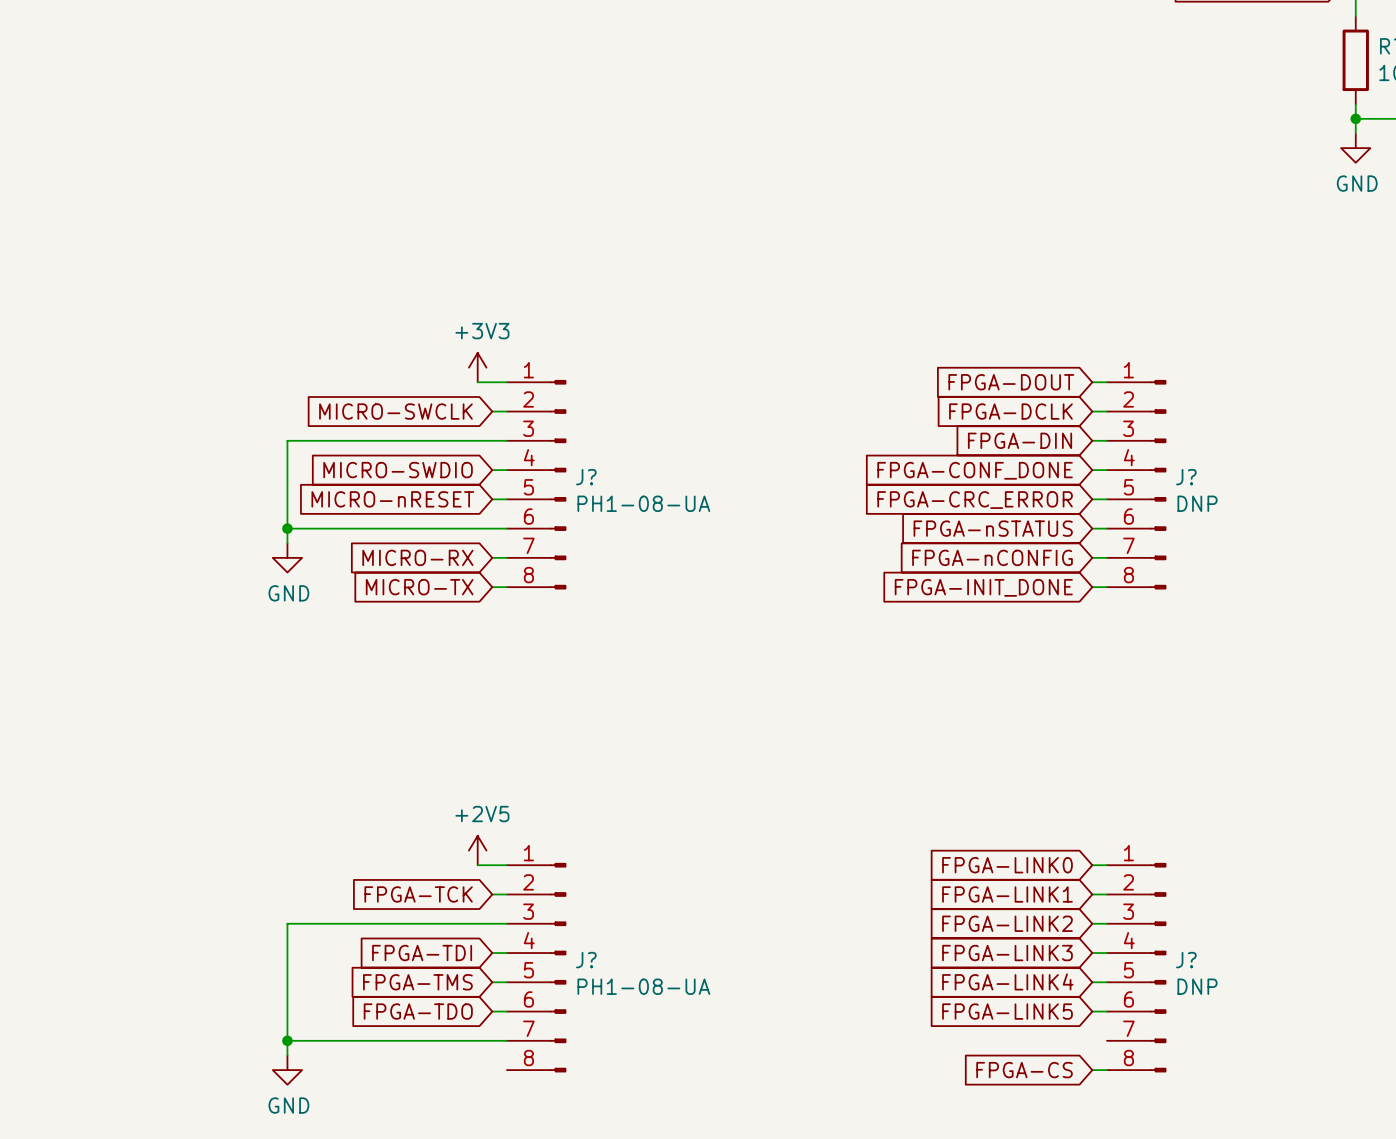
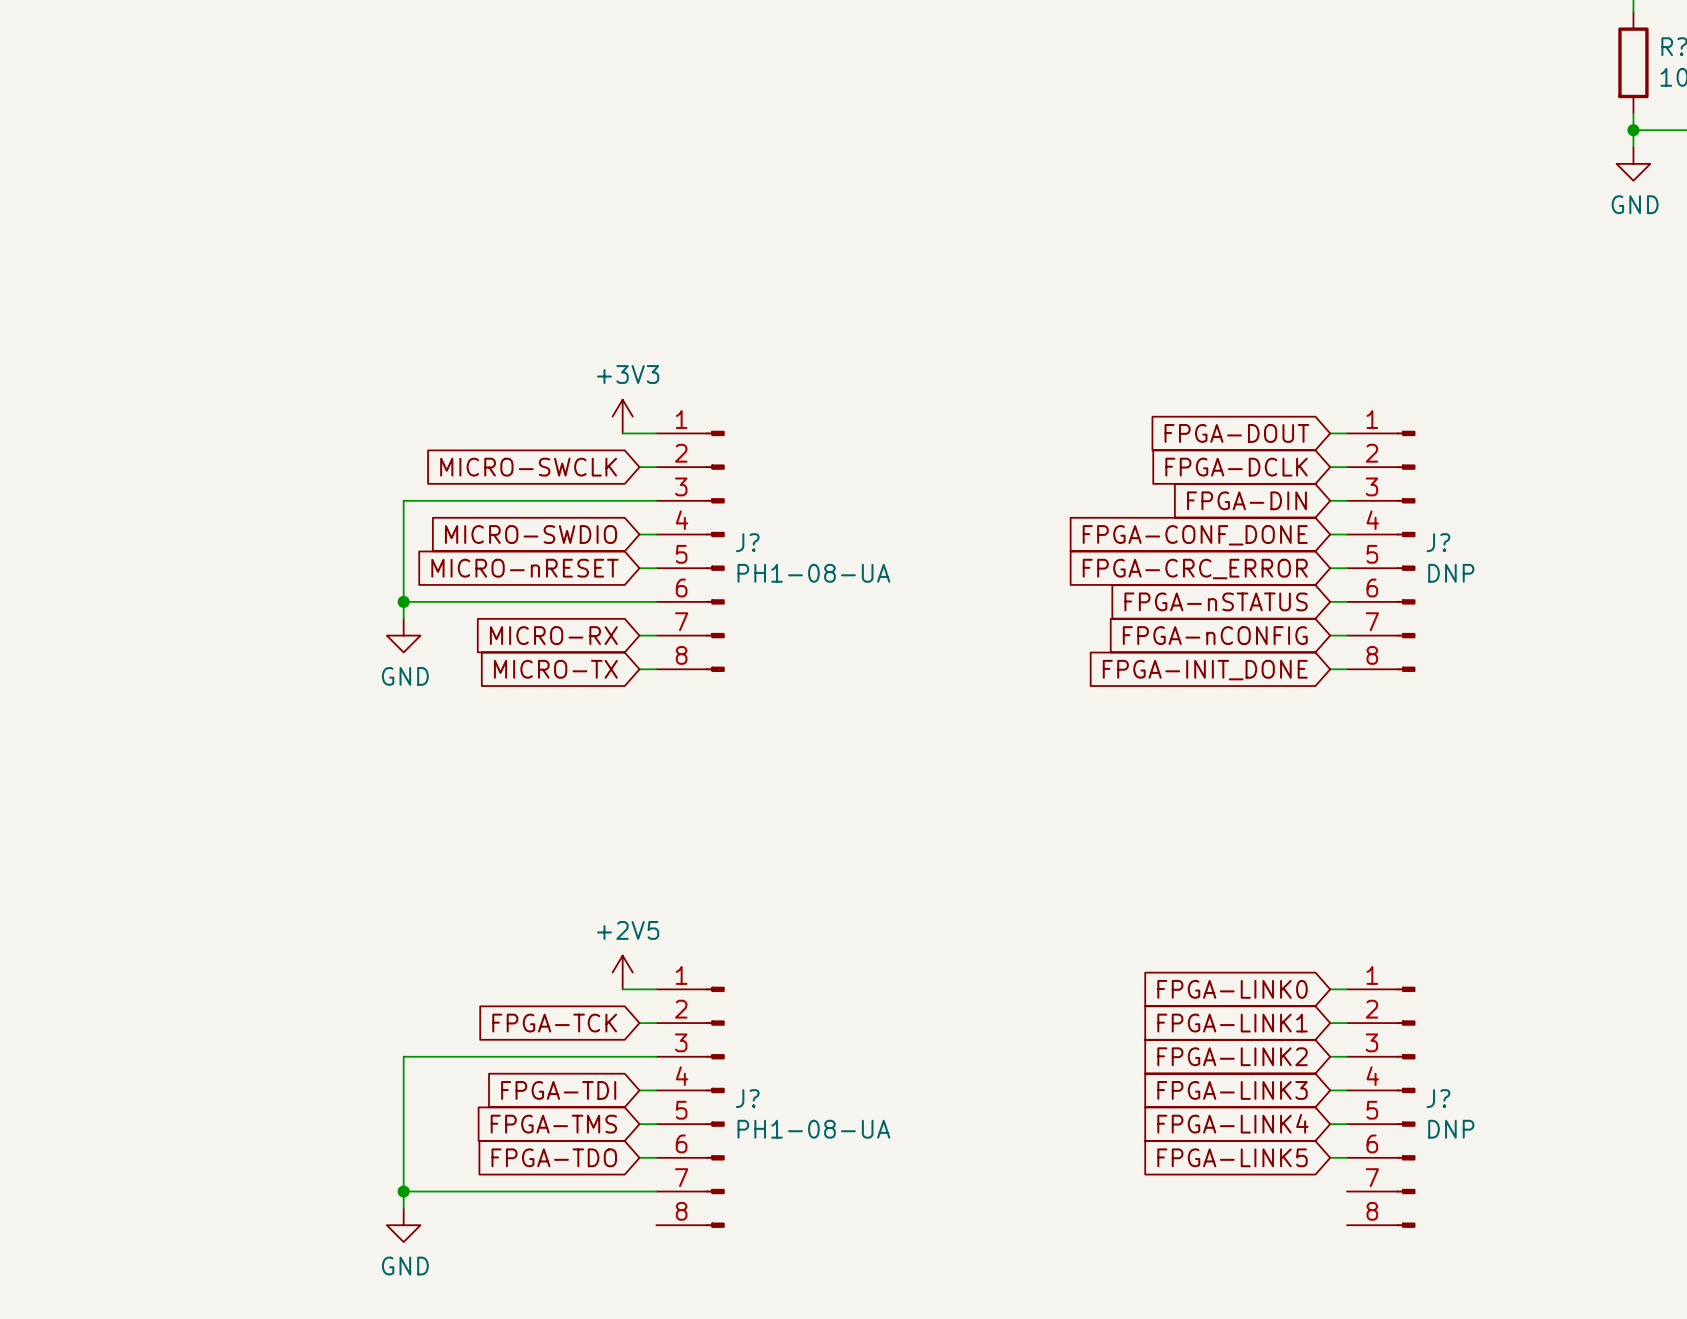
global label: FPGA-CS (1024, 1070) -> none
wire: (1092, 1070) (1106, 1070) -> none

